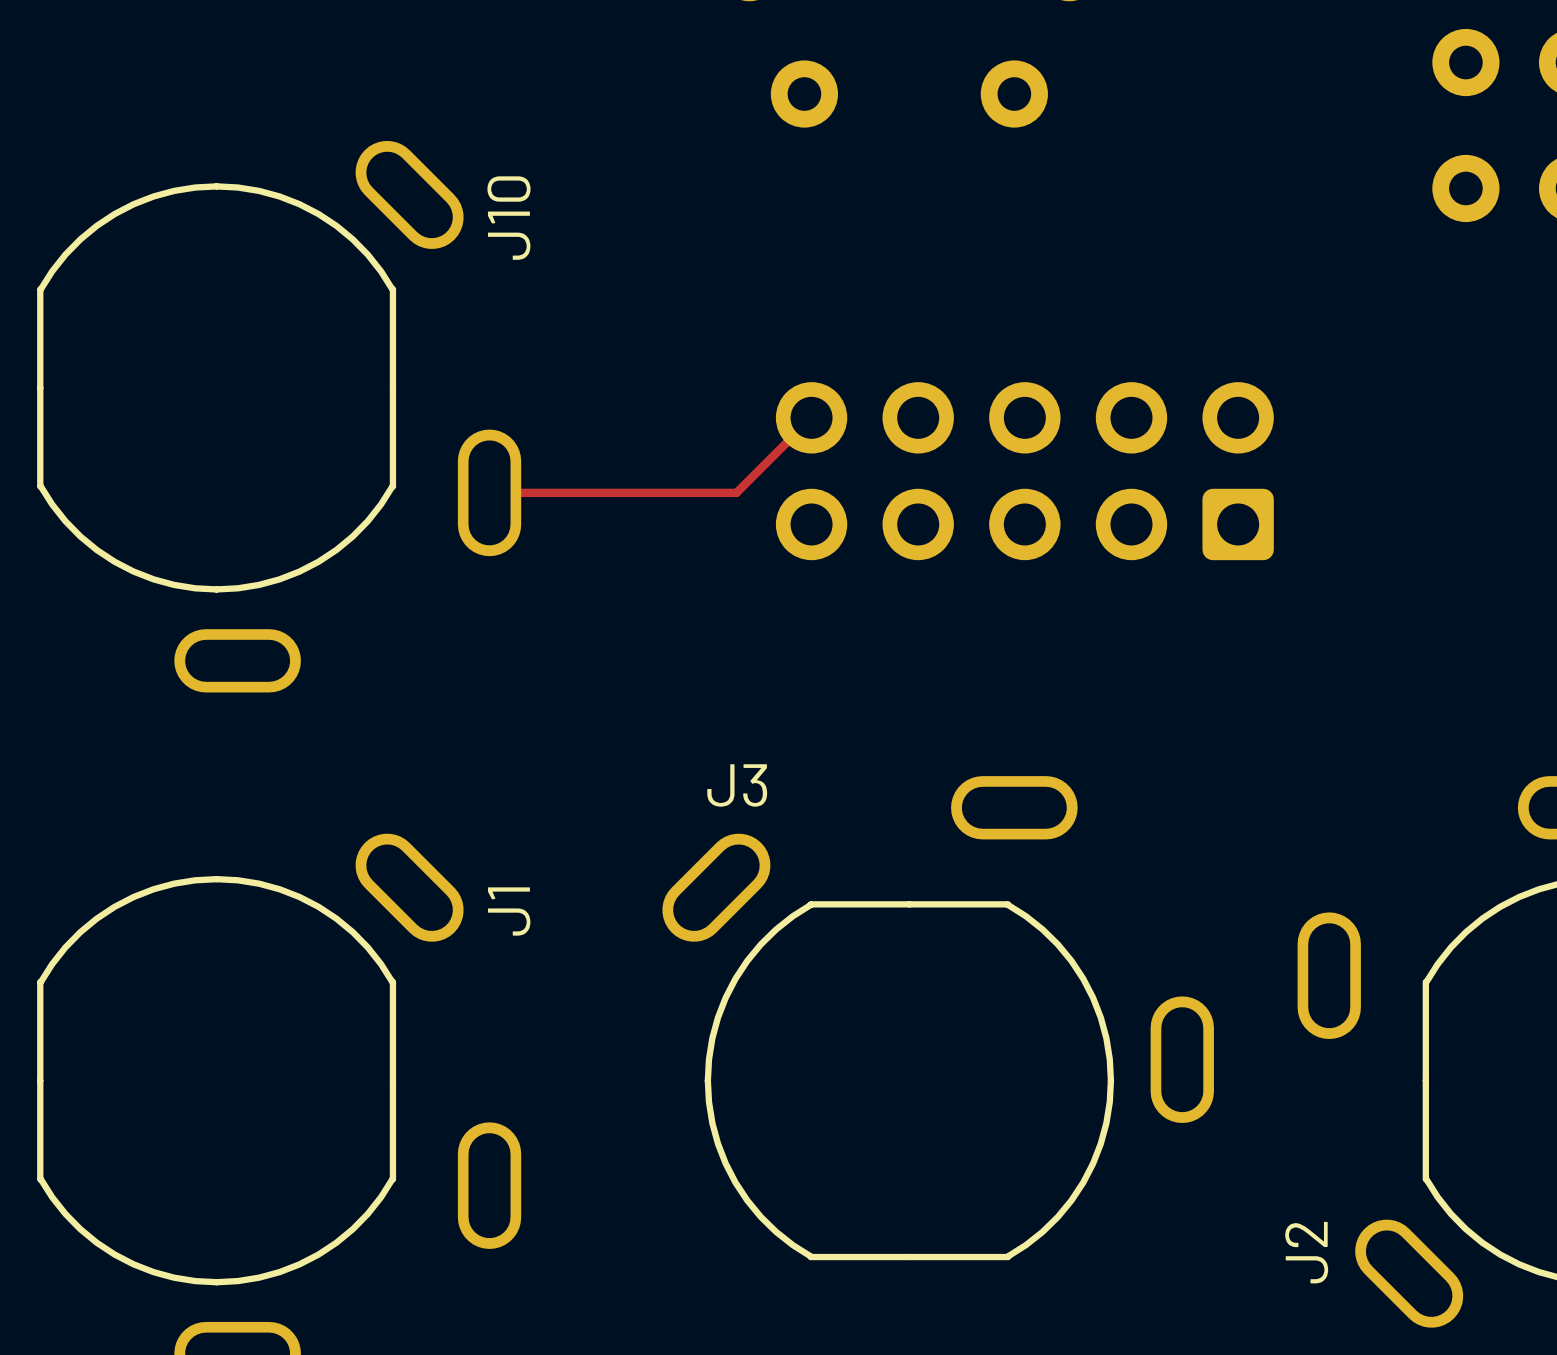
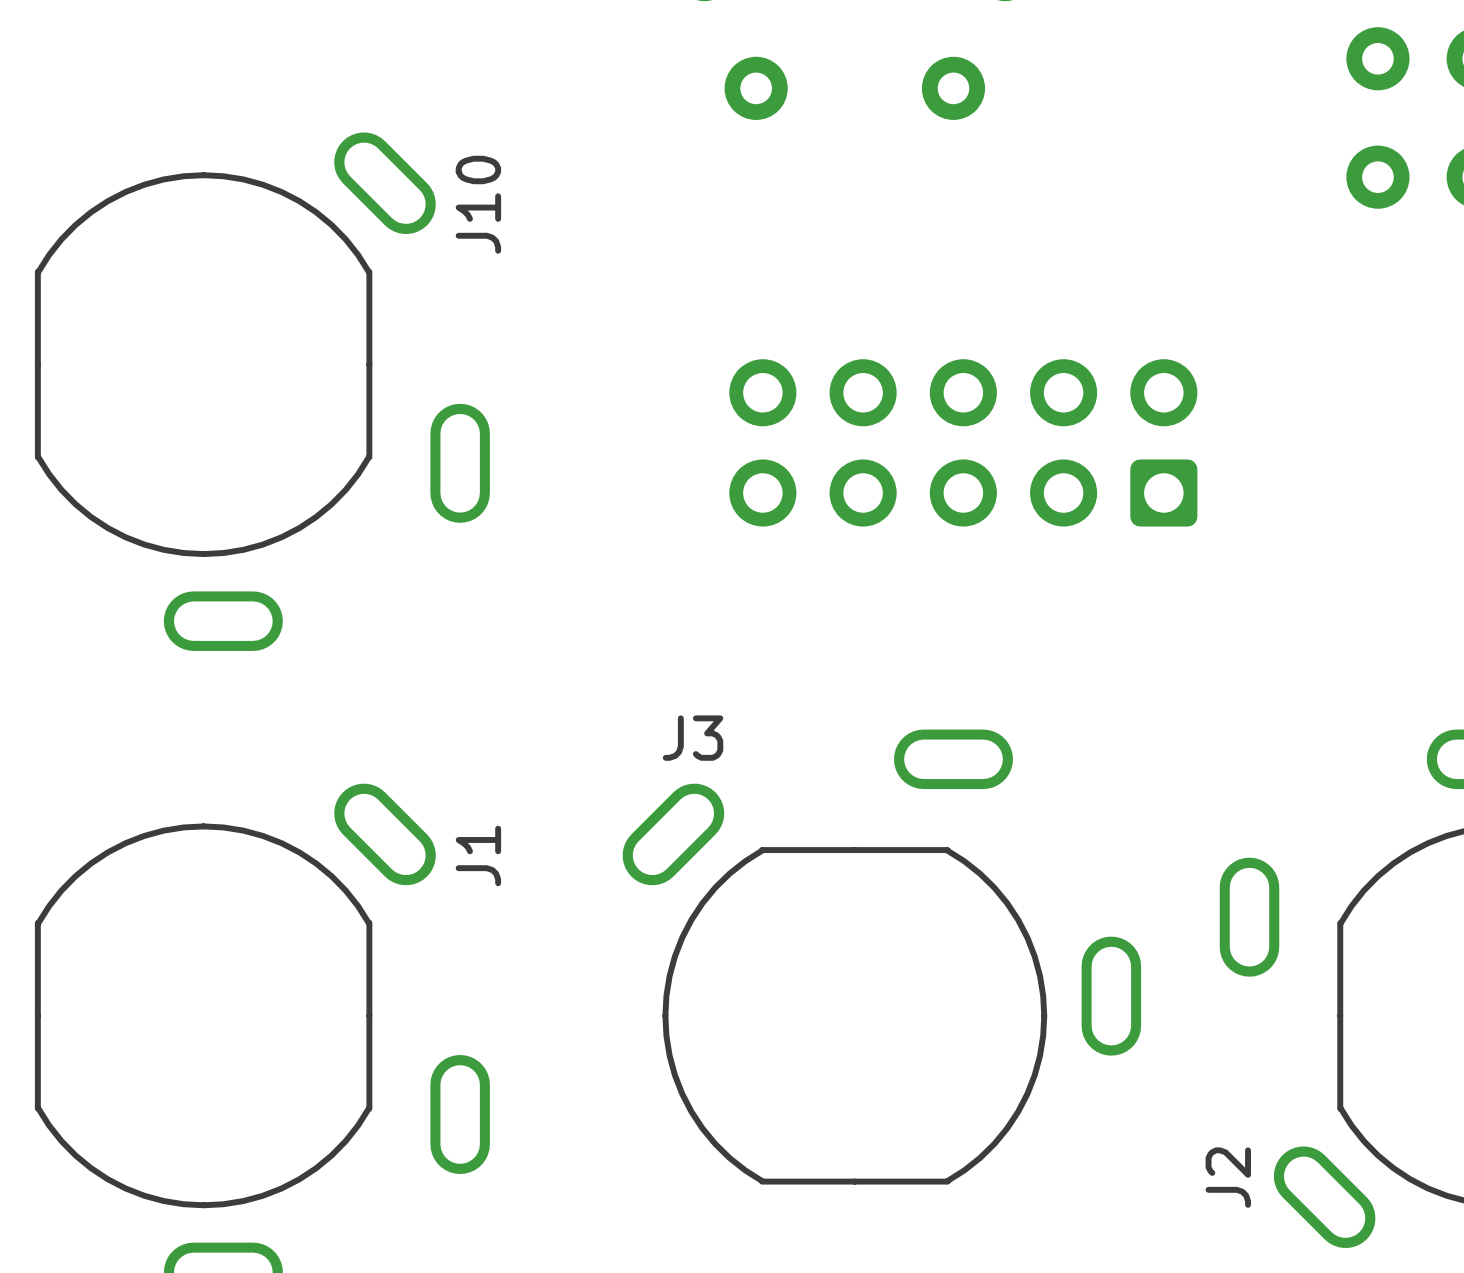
track: (811, 417) (736, 492) (489, 492) -> none

